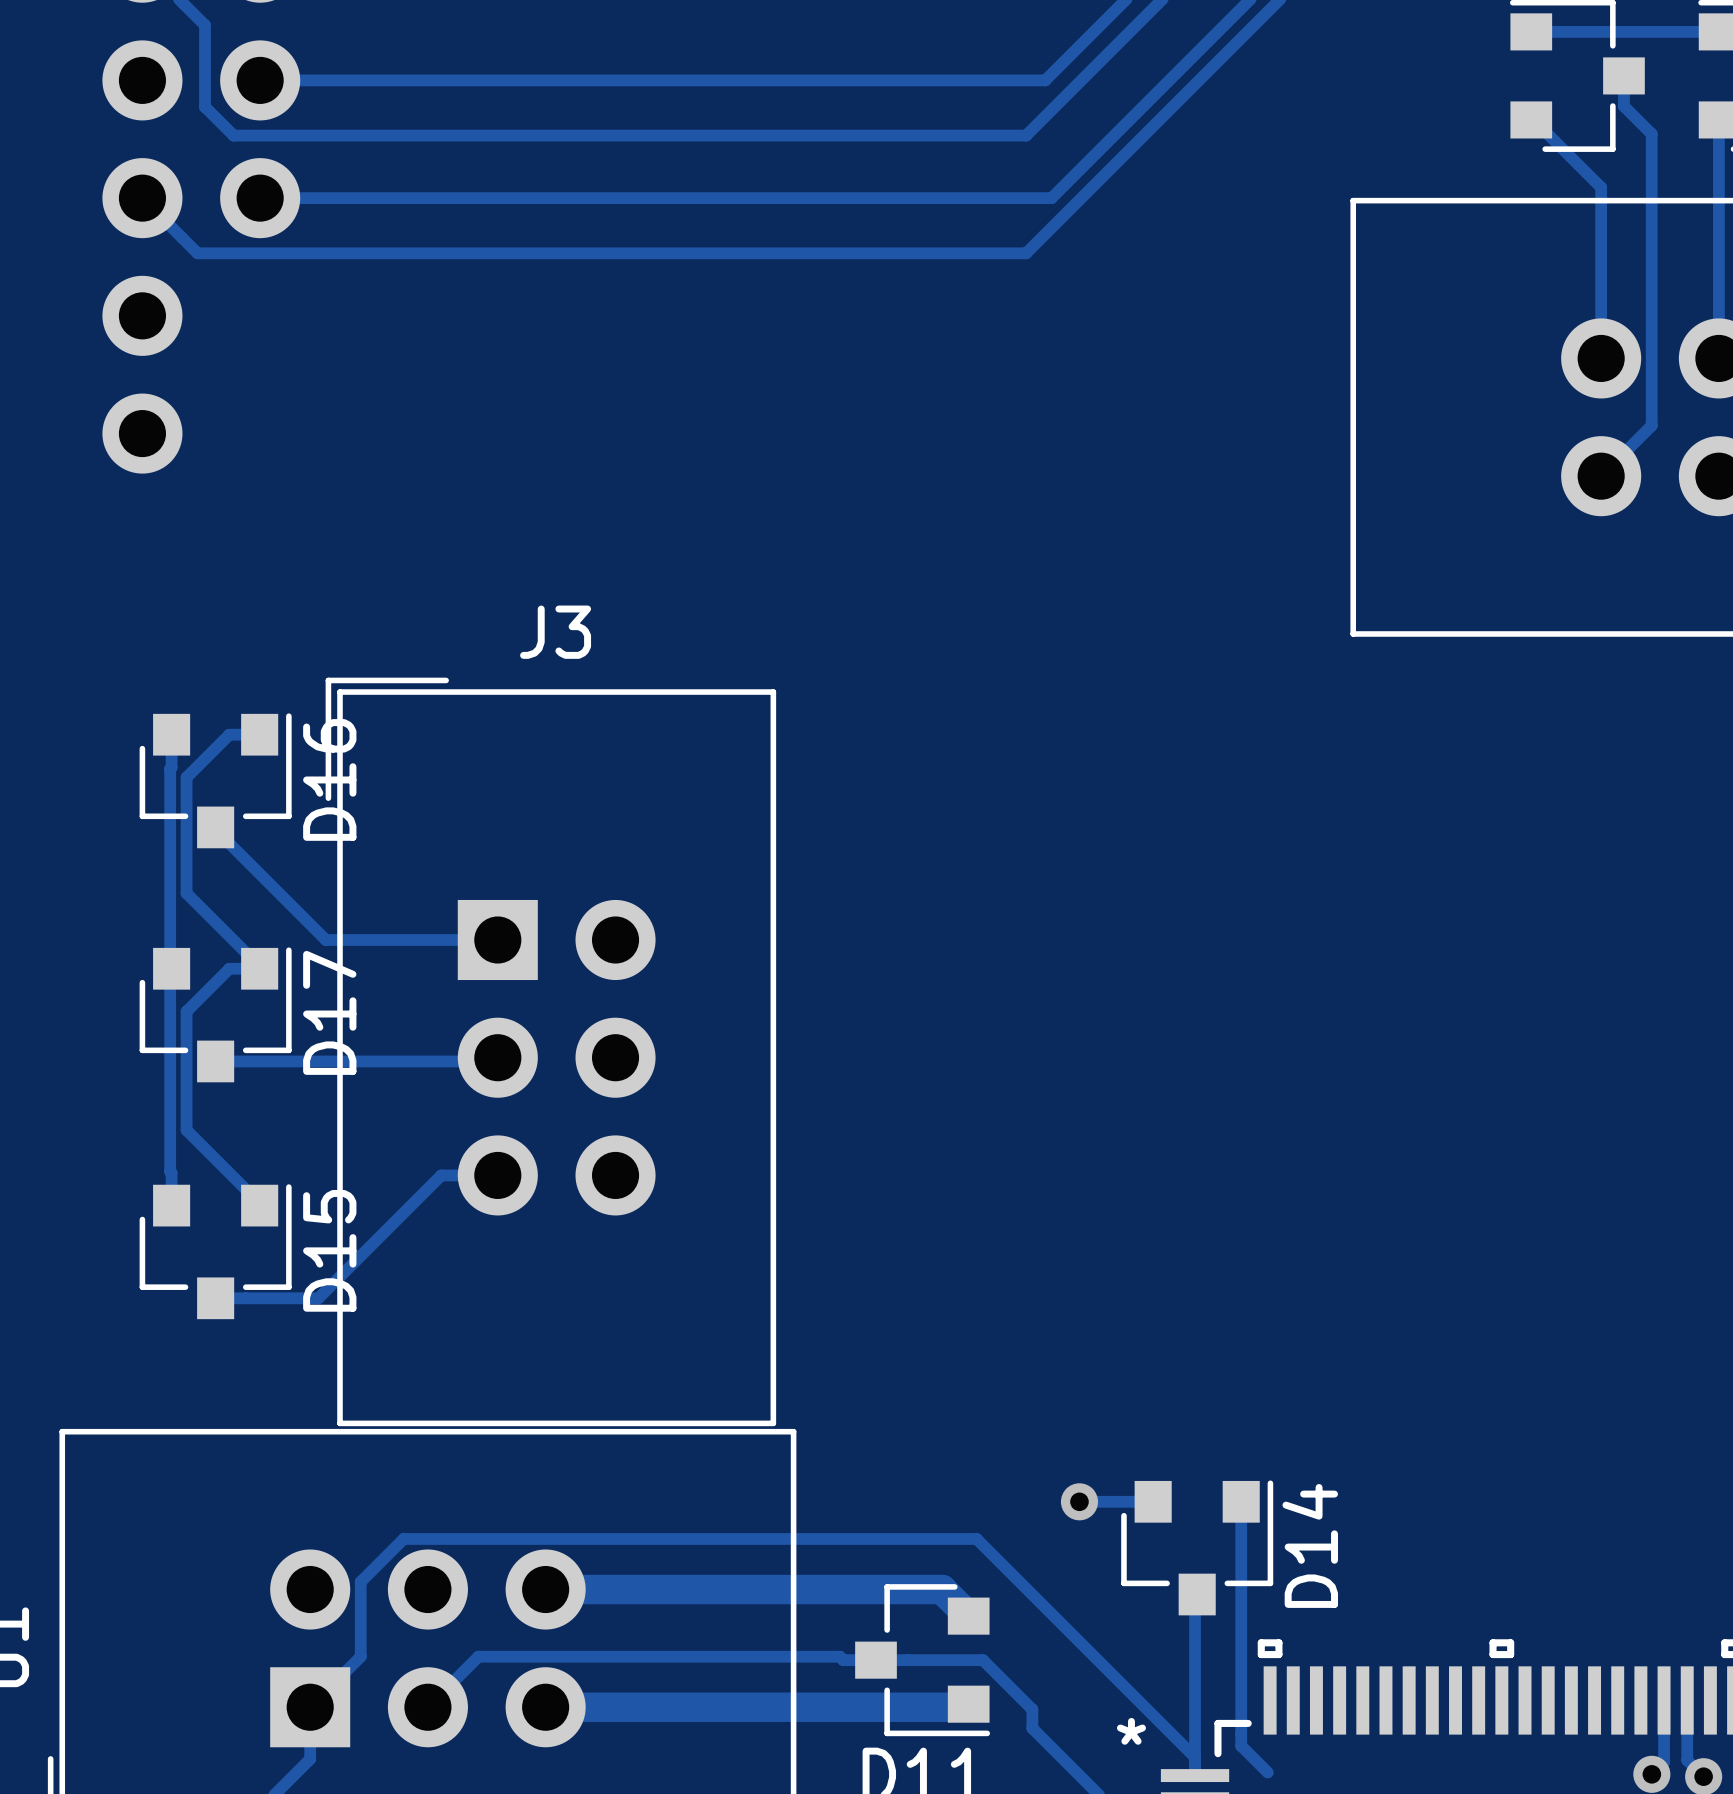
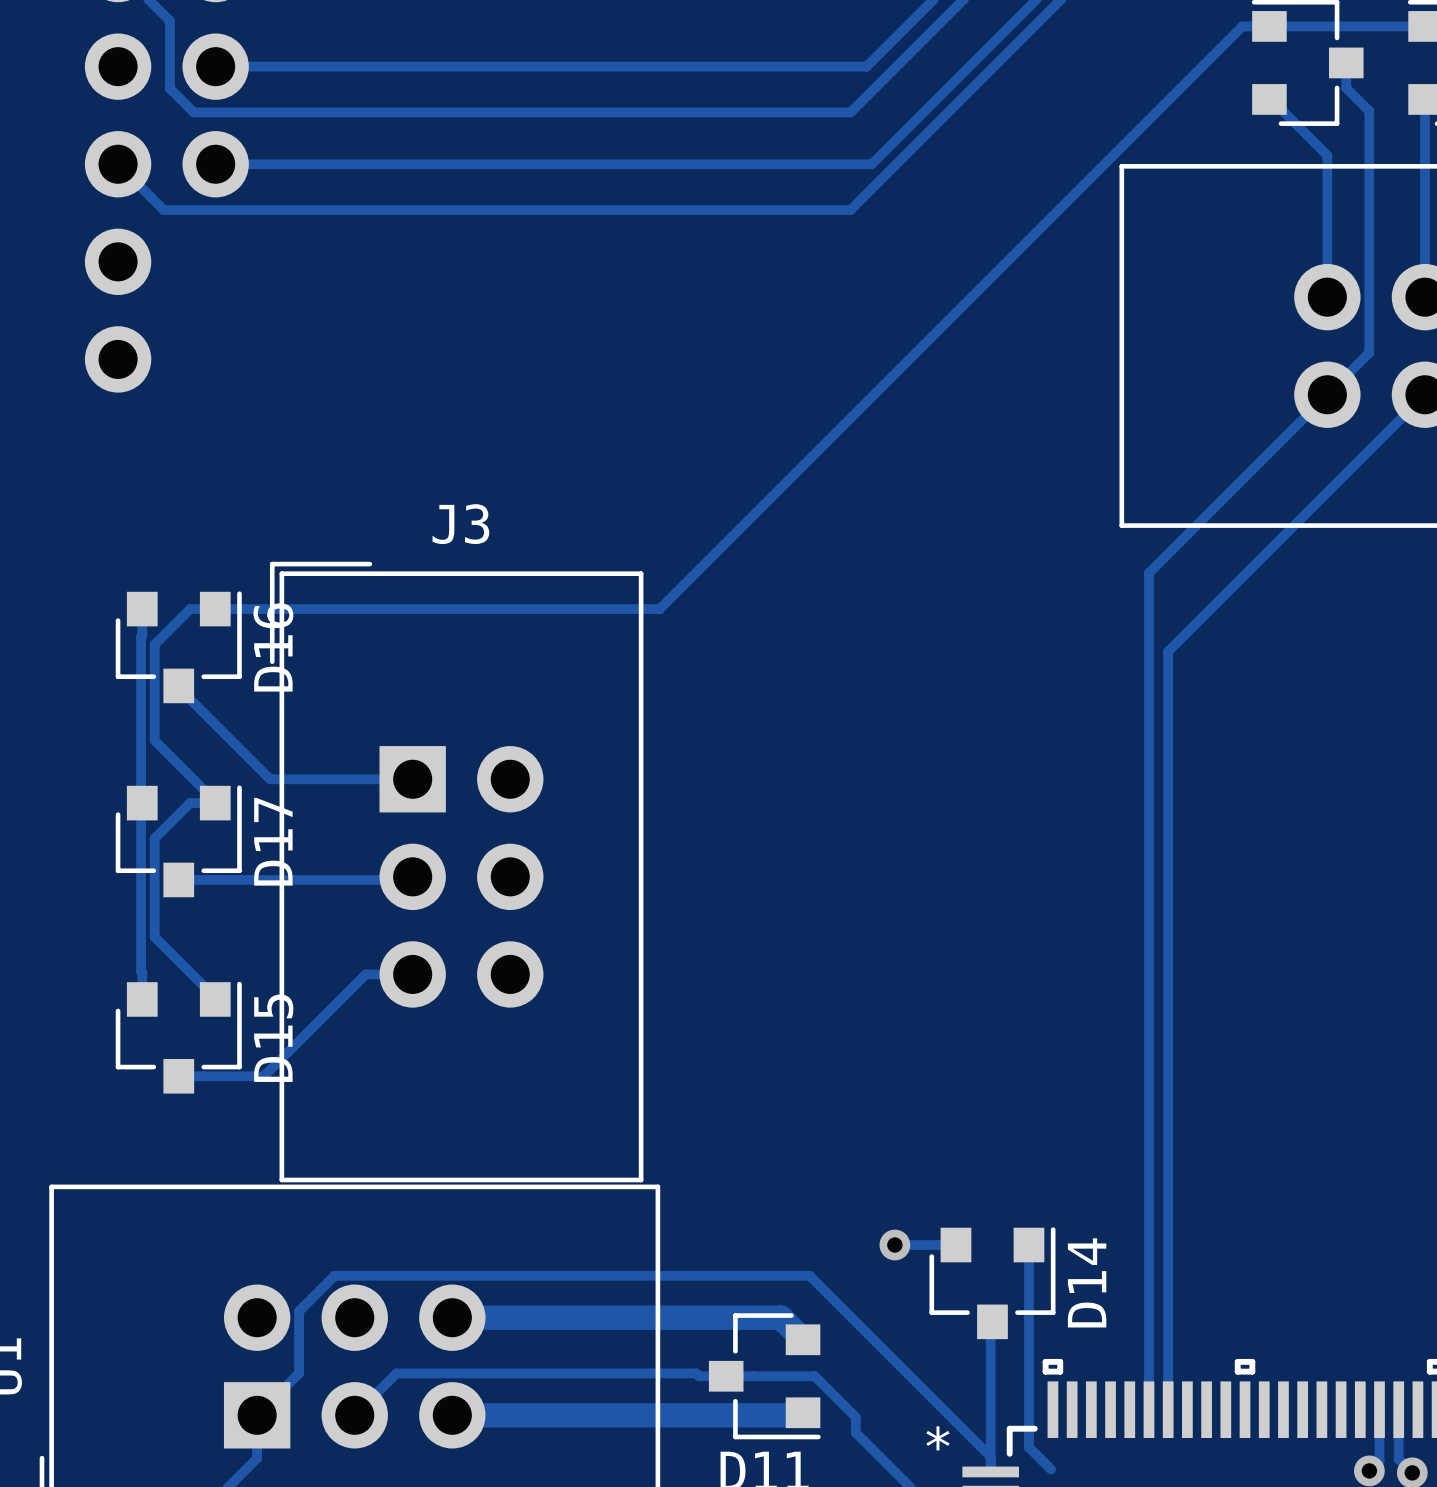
track: none -> (1269, 26) (1242, 26) (659, 609) (215, 609)
track: none -> (1327, 394) (1148, 573) (1148, 1409)
track: none -> (1424, 394) (1168, 651) (1168, 1409)

